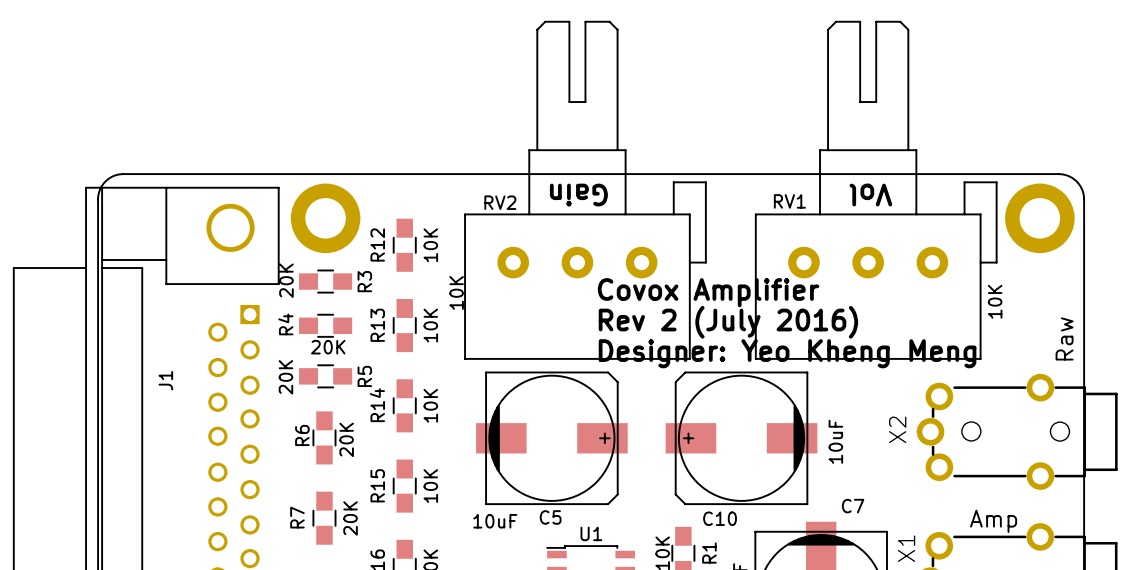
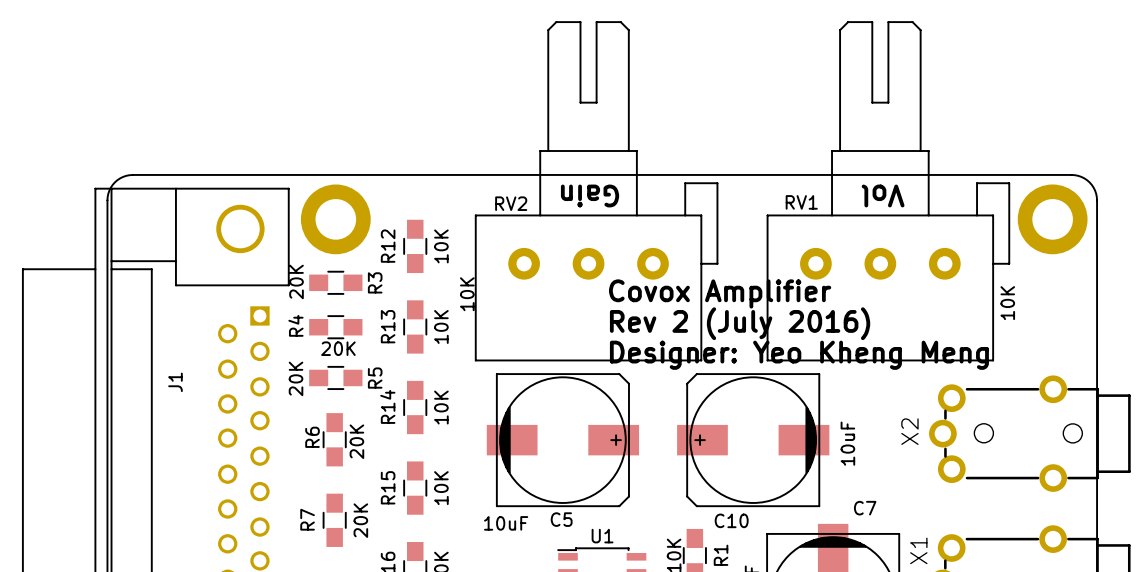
X2 value: Raw (1064, 338) -> none
X1 value: Amp (993, 521) -> none

